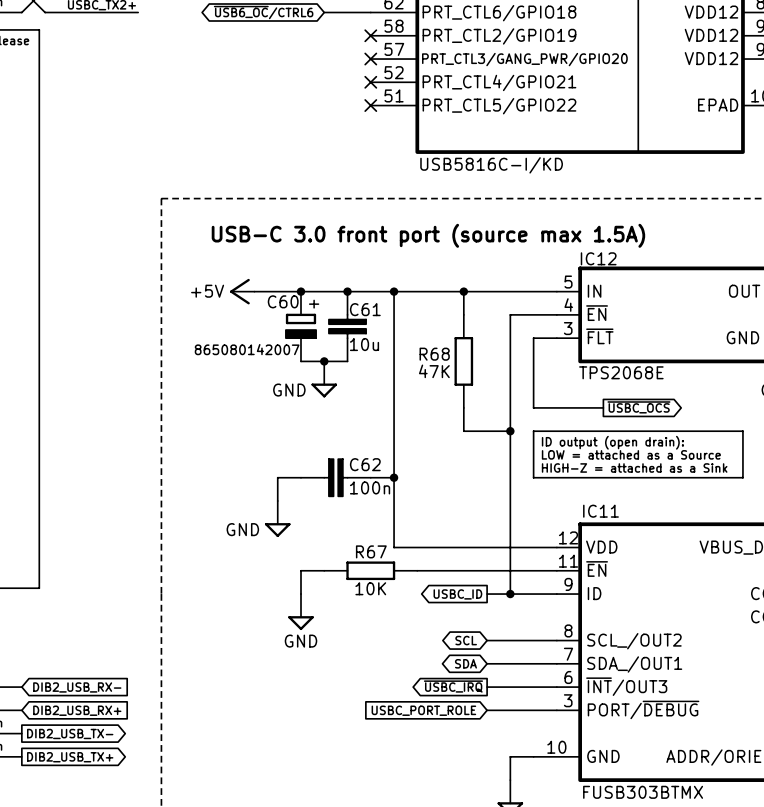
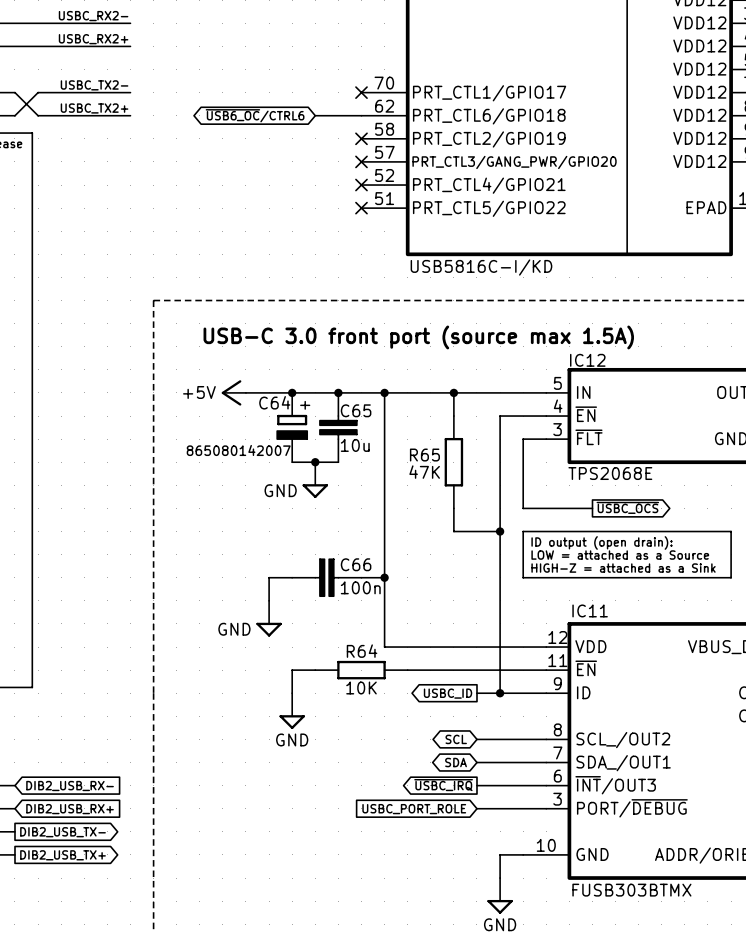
C60 name: C60 (283, 301) -> C64 (274, 402)
C61 name: C61 (365, 309) -> C65 (356, 410)
R68 name: R68 (434, 354) -> R65 (424, 455)
C62 name: C62 (365, 464) -> C66 (356, 564)
R67 name: R67 (371, 551) -> R64 (362, 651)

